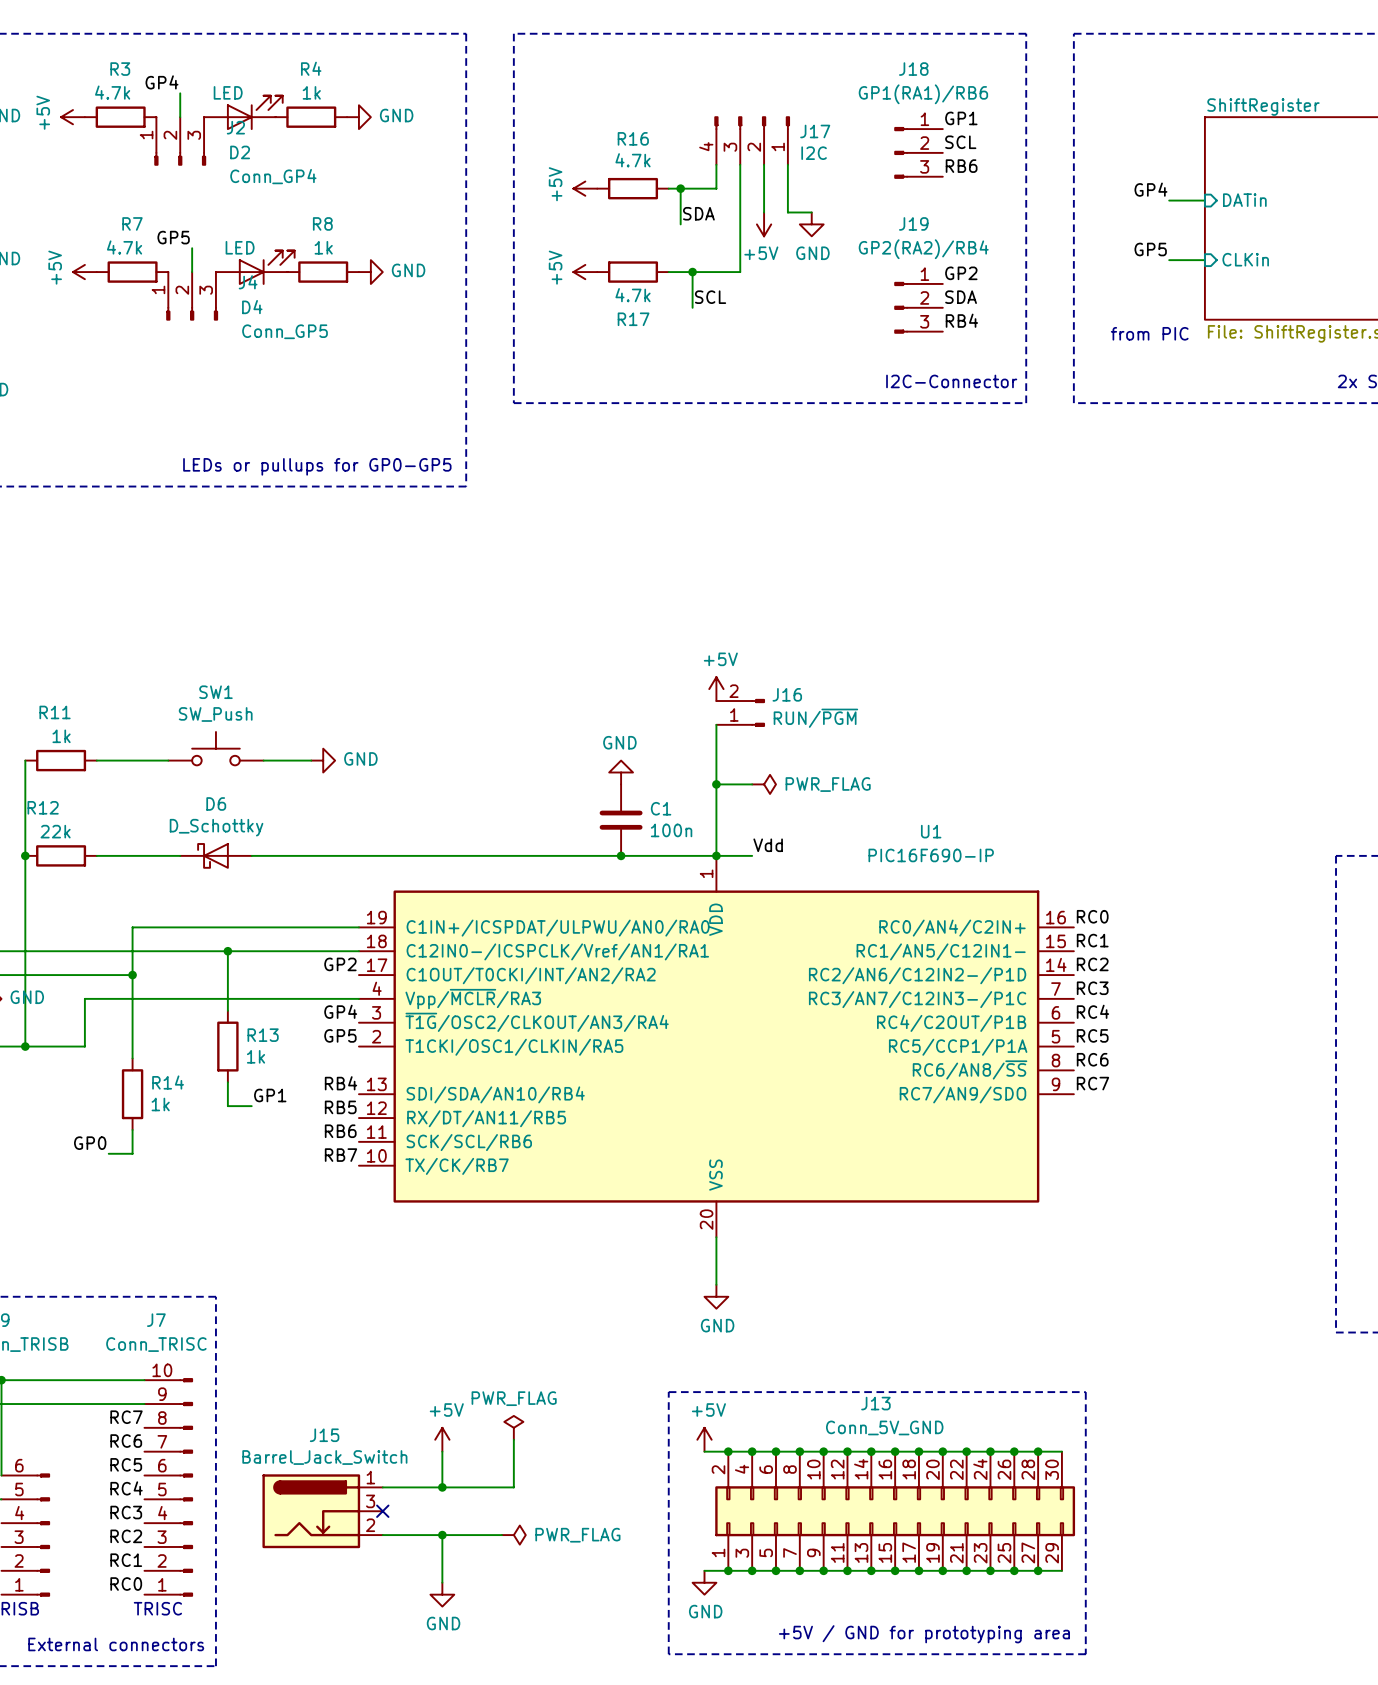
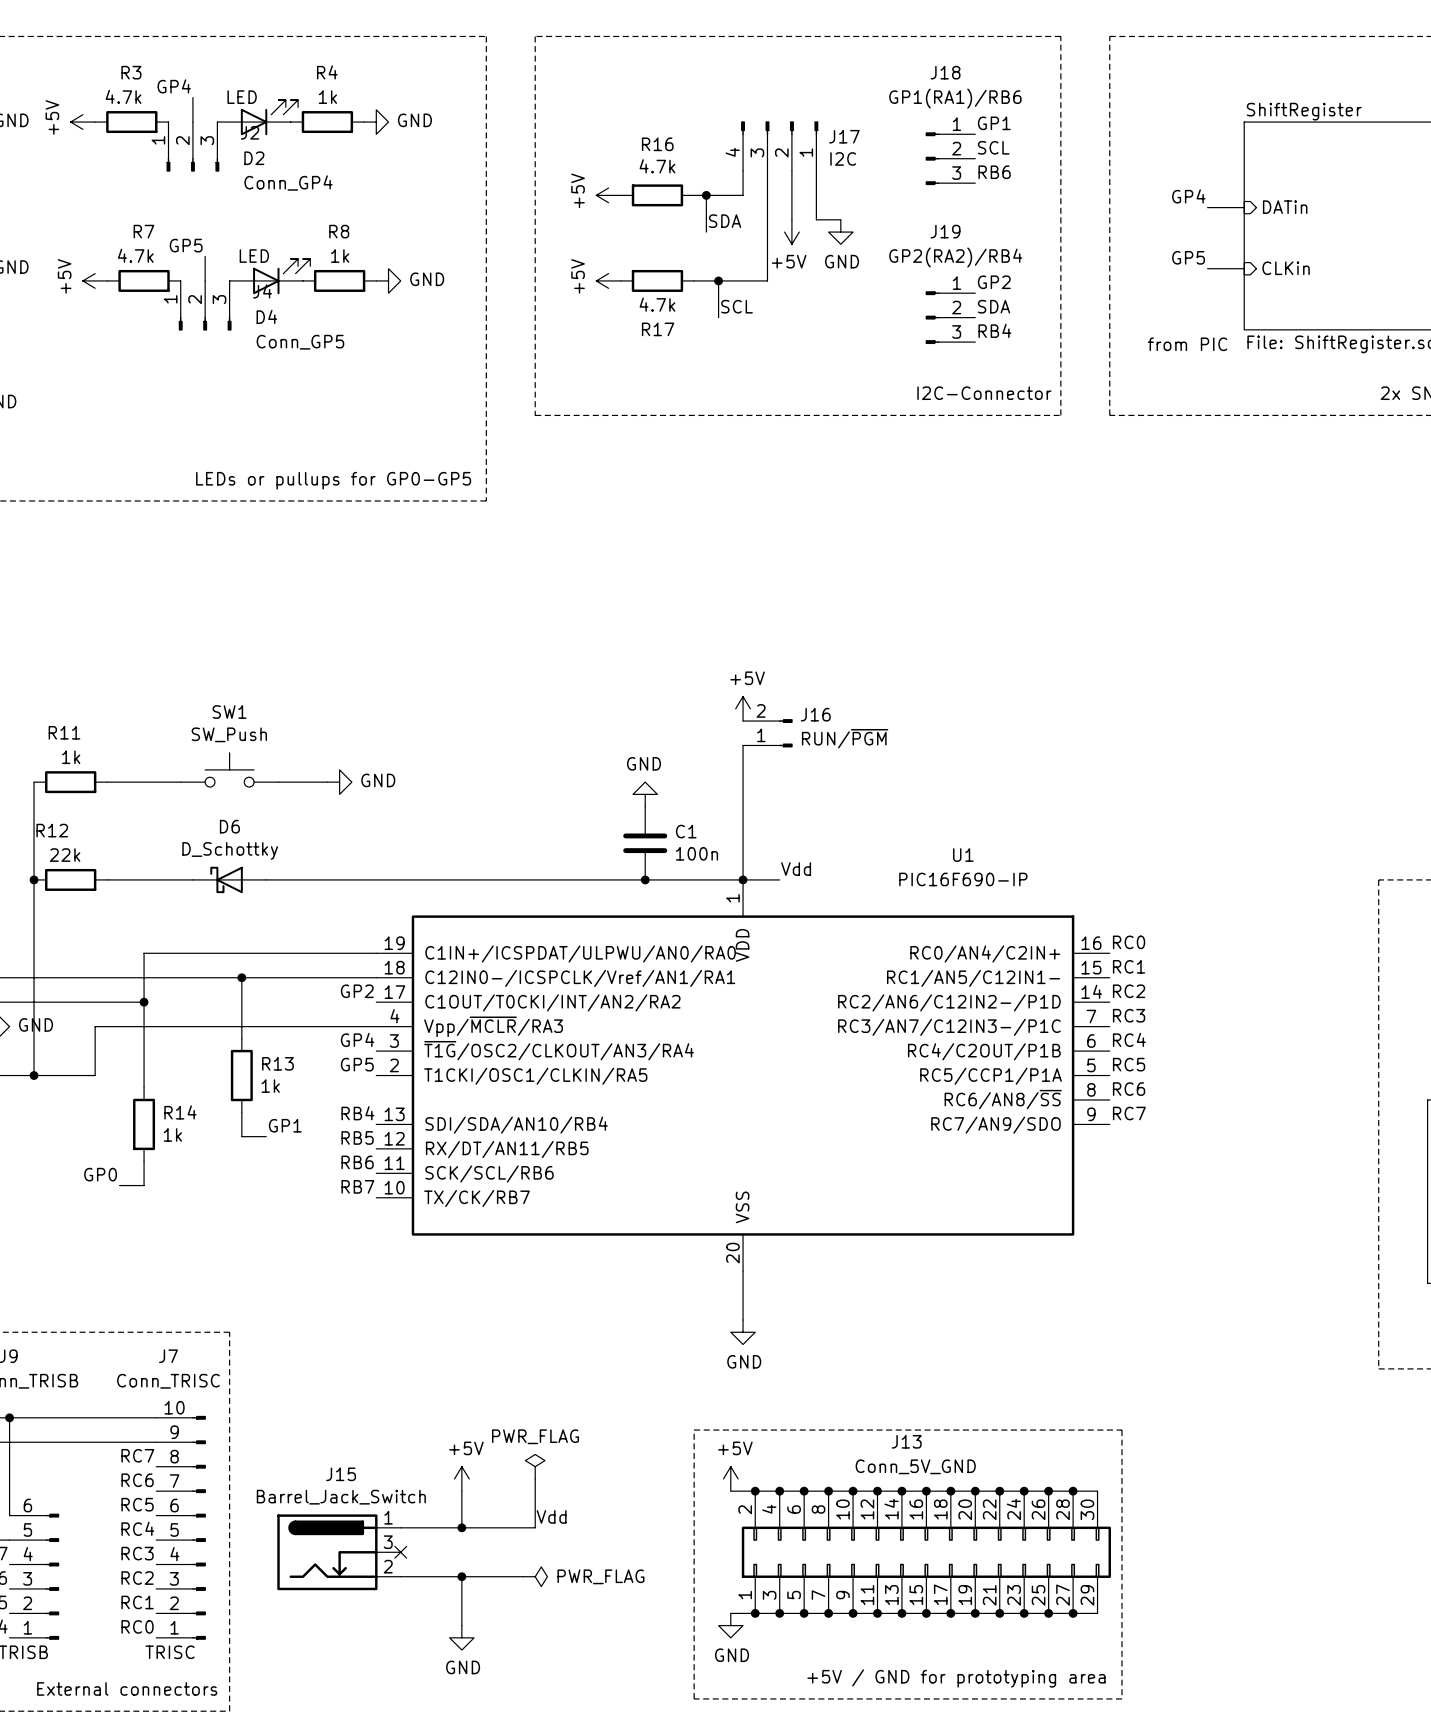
wire: (716, 784) (752, 784) -> none
junction: (716, 784) -> none
power symbol: PWR_FLAG (764, 784) -> none
label: none -> Vdd (551, 1516)

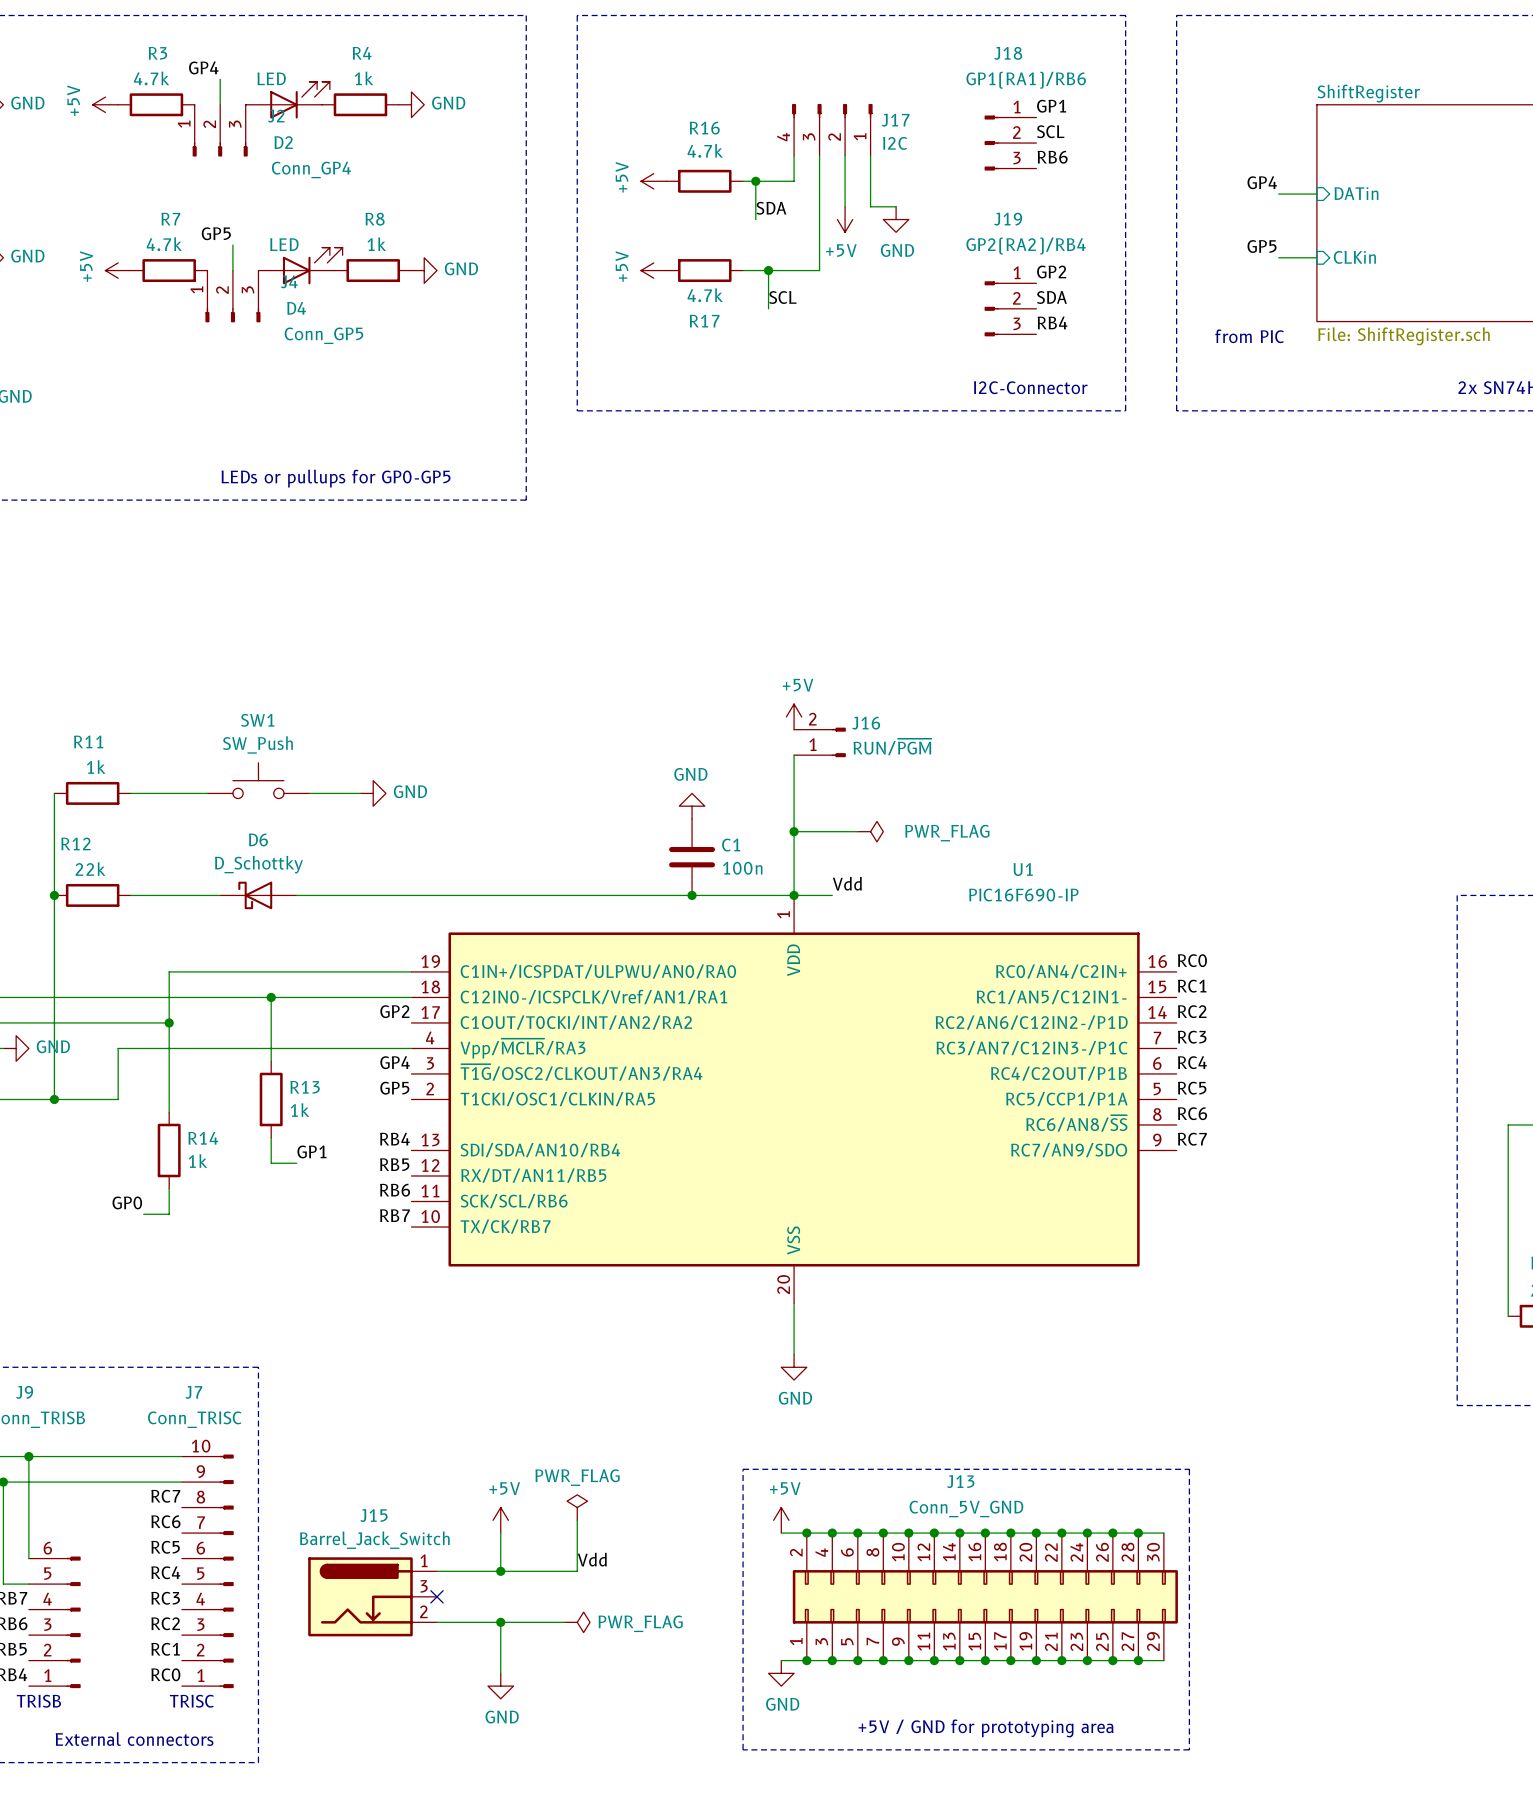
wire: none -> (794, 831) (857, 831)
junction: none -> (794, 831)
power symbol: none -> PWR_FLAG (870, 831)

